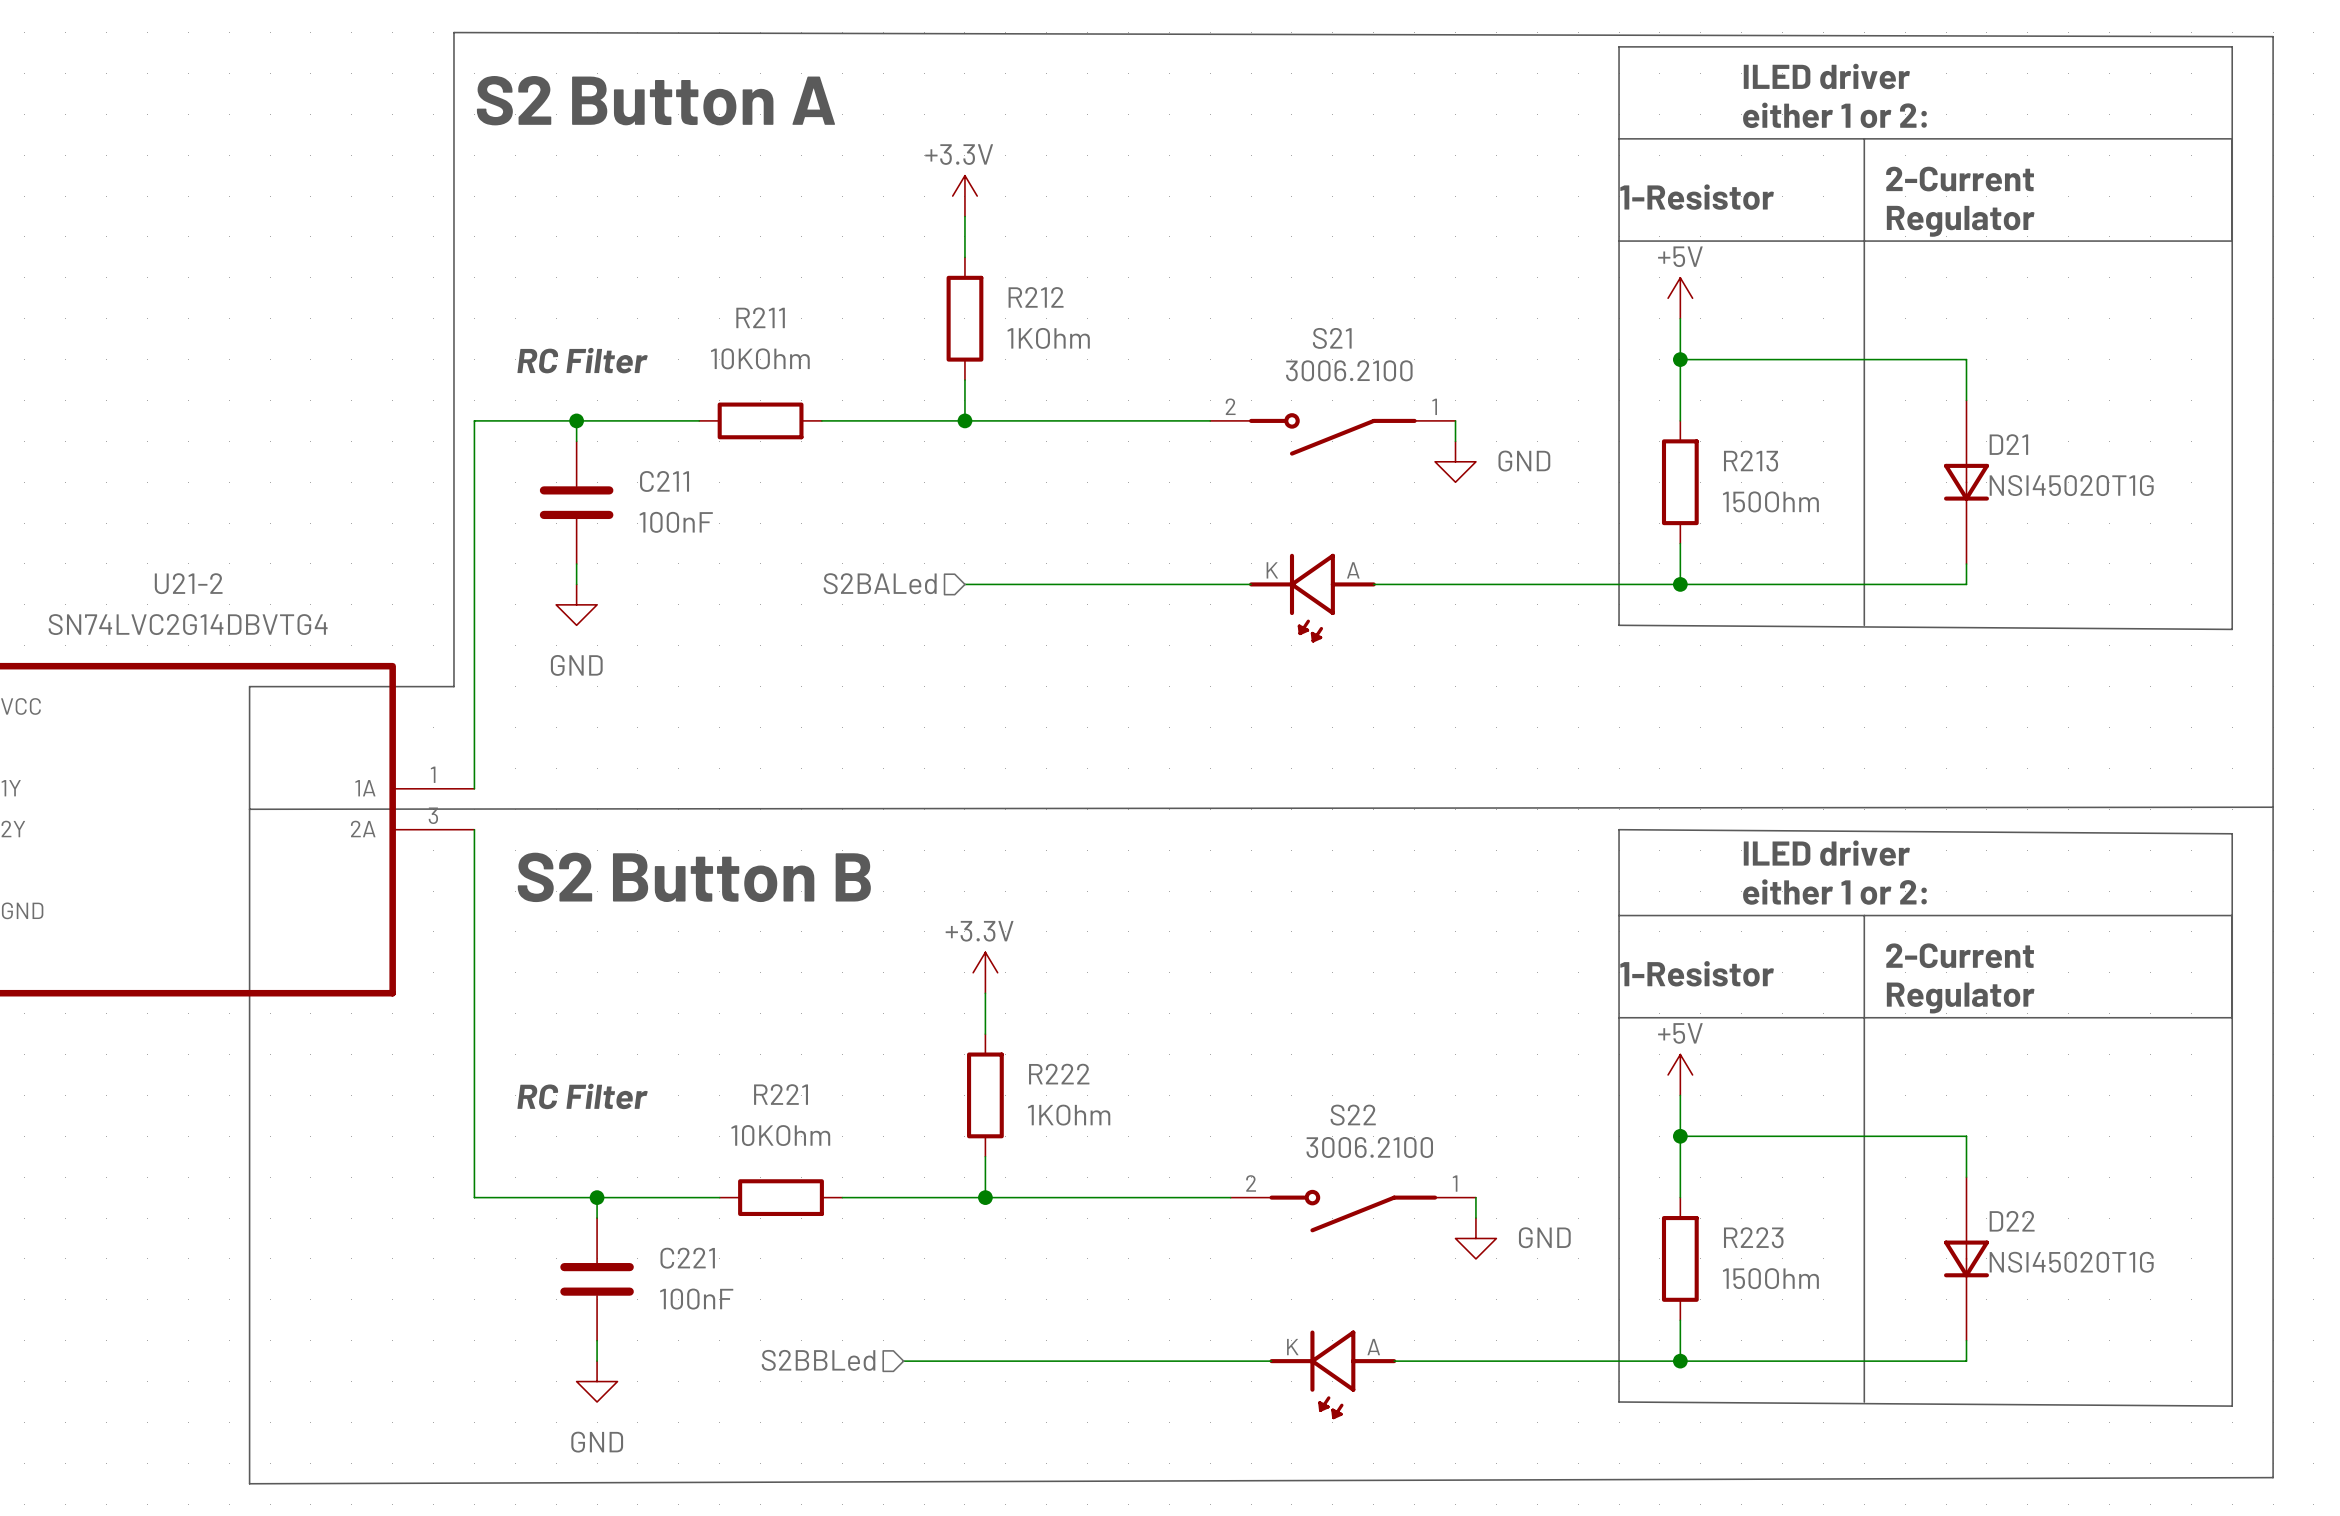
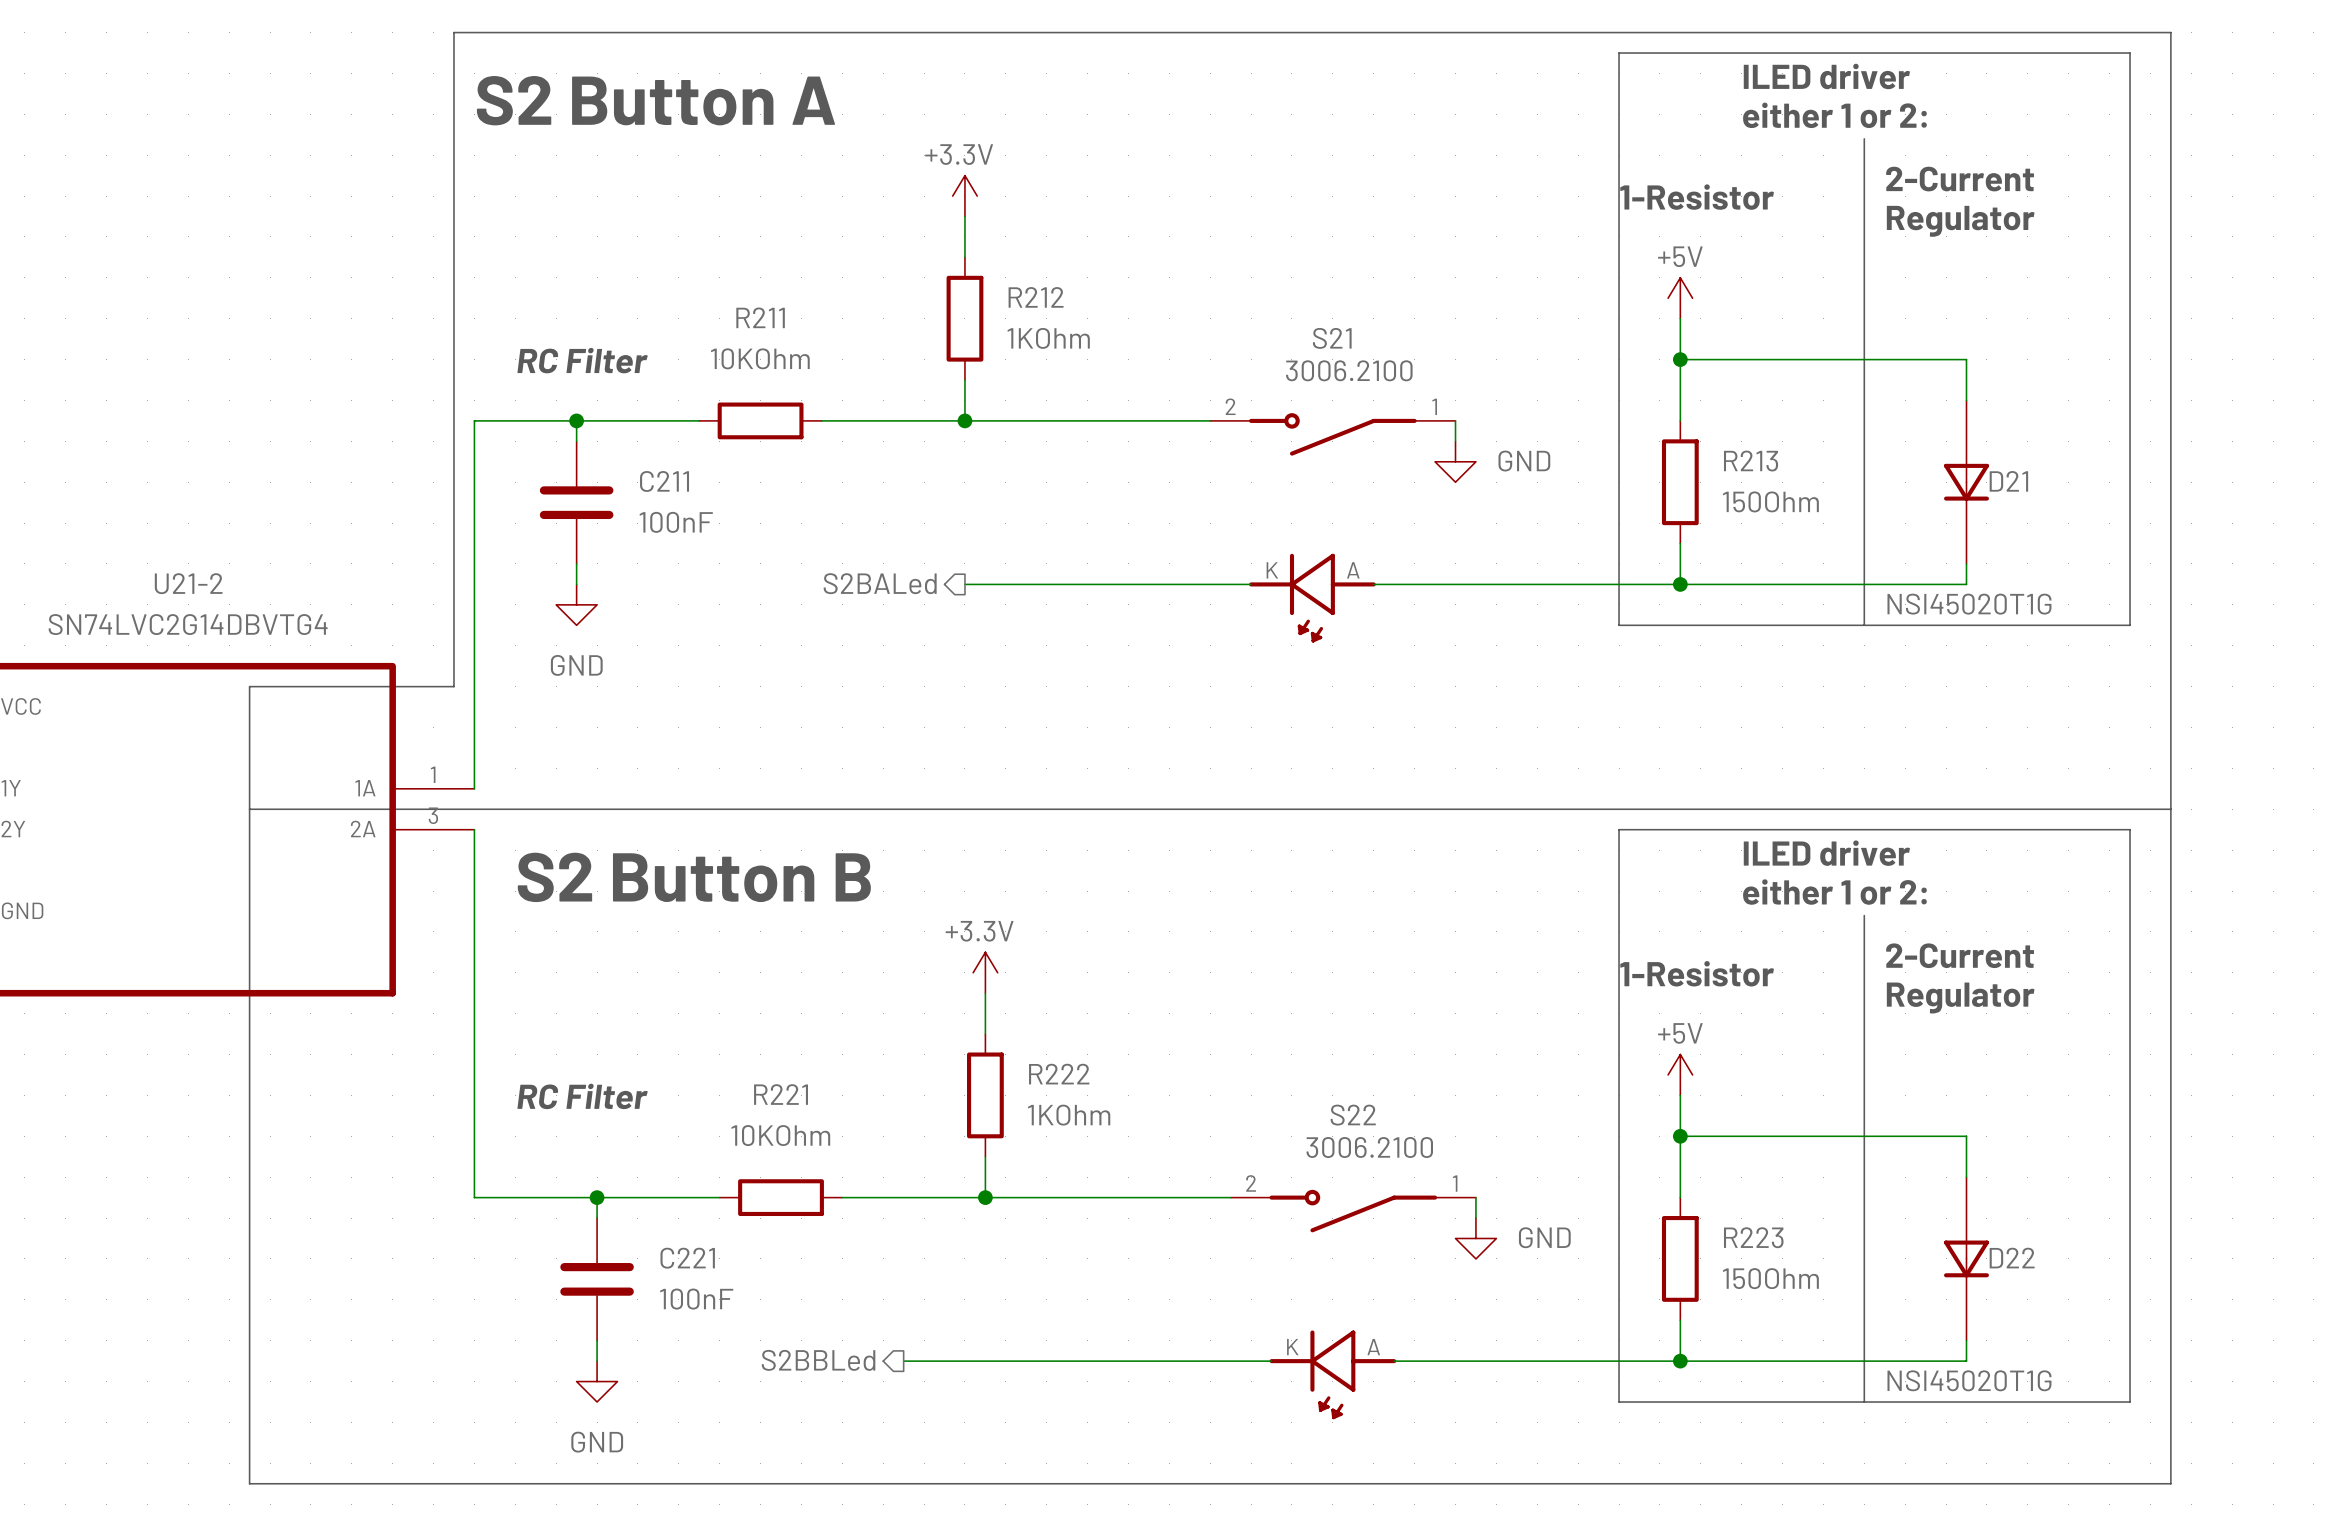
line: (453, 32) (2273, 36) (2273, 1477) (249, 1483) -> (453, 32) (2170, 32) (2170, 1483) (249, 1483)
line: (1619, 53) (1619, 46) (2232, 46) (2232, 629) (1619, 625) -> (1619, 53) (2130, 53) (2130, 625) (1619, 625)
line: (1619, 138) (2232, 138) -> none
line: (1619, 241) (2232, 241) -> none
D21 name position: D21 (2008, 444) -> D21 (2008, 481)
D21 value position: NSI45020T1G (2071, 485) -> NSI45020T1G (1969, 604)
hierarchical label shape: input (880, 583) -> output (880, 583)
line: (2273, 807) (249, 809) -> (2170, 809) (249, 809)
line: (1619, 829) (2232, 833) (2232, 1406) (1619, 1402) -> (1619, 829) (2130, 829) (2130, 1402) (1619, 1402)
line: (1619, 915) (2232, 915) -> none
line: (1619, 1017) (2232, 1017) -> none
D22 name position: D22 (2012, 1221) -> D22 (2012, 1258)
D22 value position: NSI45020T1G (2071, 1262) -> NSI45020T1G (1969, 1380)
hierarchical label shape: input (818, 1360) -> output (818, 1360)

